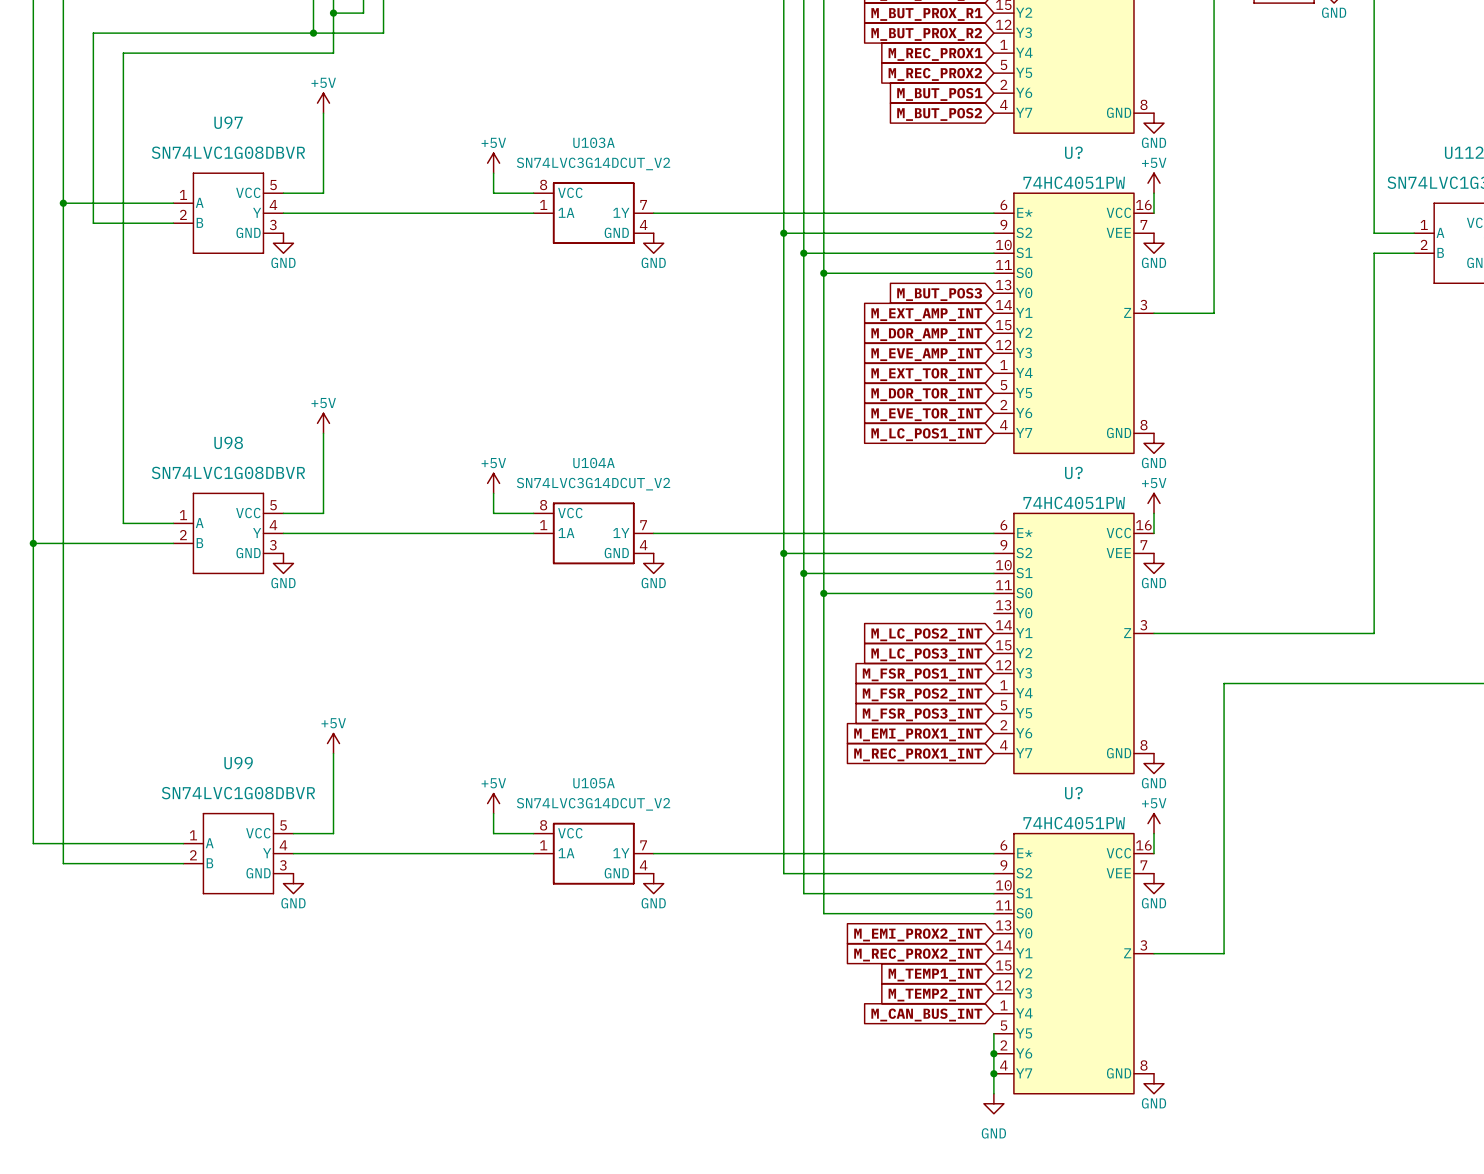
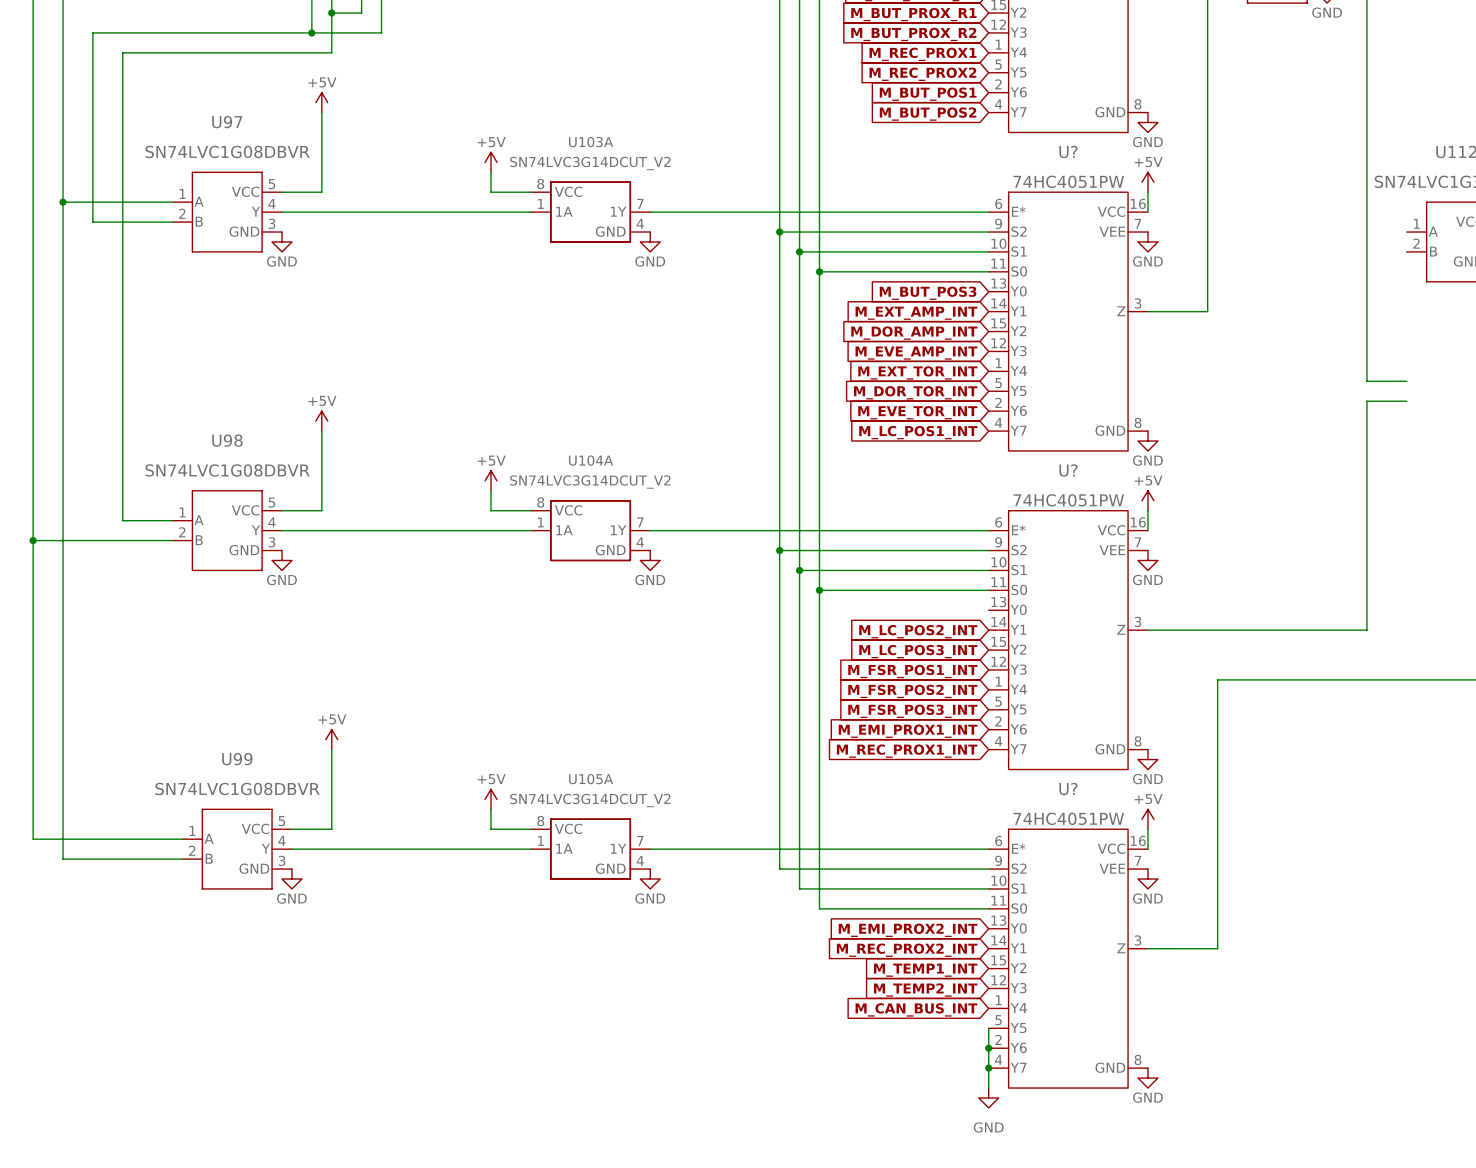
wire: (1374, 233) (1414, 233) -> (1366, 232) (1366, 251)
wire: (1374, 253) (1414, 253) -> (1366, 401) (1406, 401)
wire: (1374, 383) (1374, 403) -> (1366, 381) (1406, 381)

